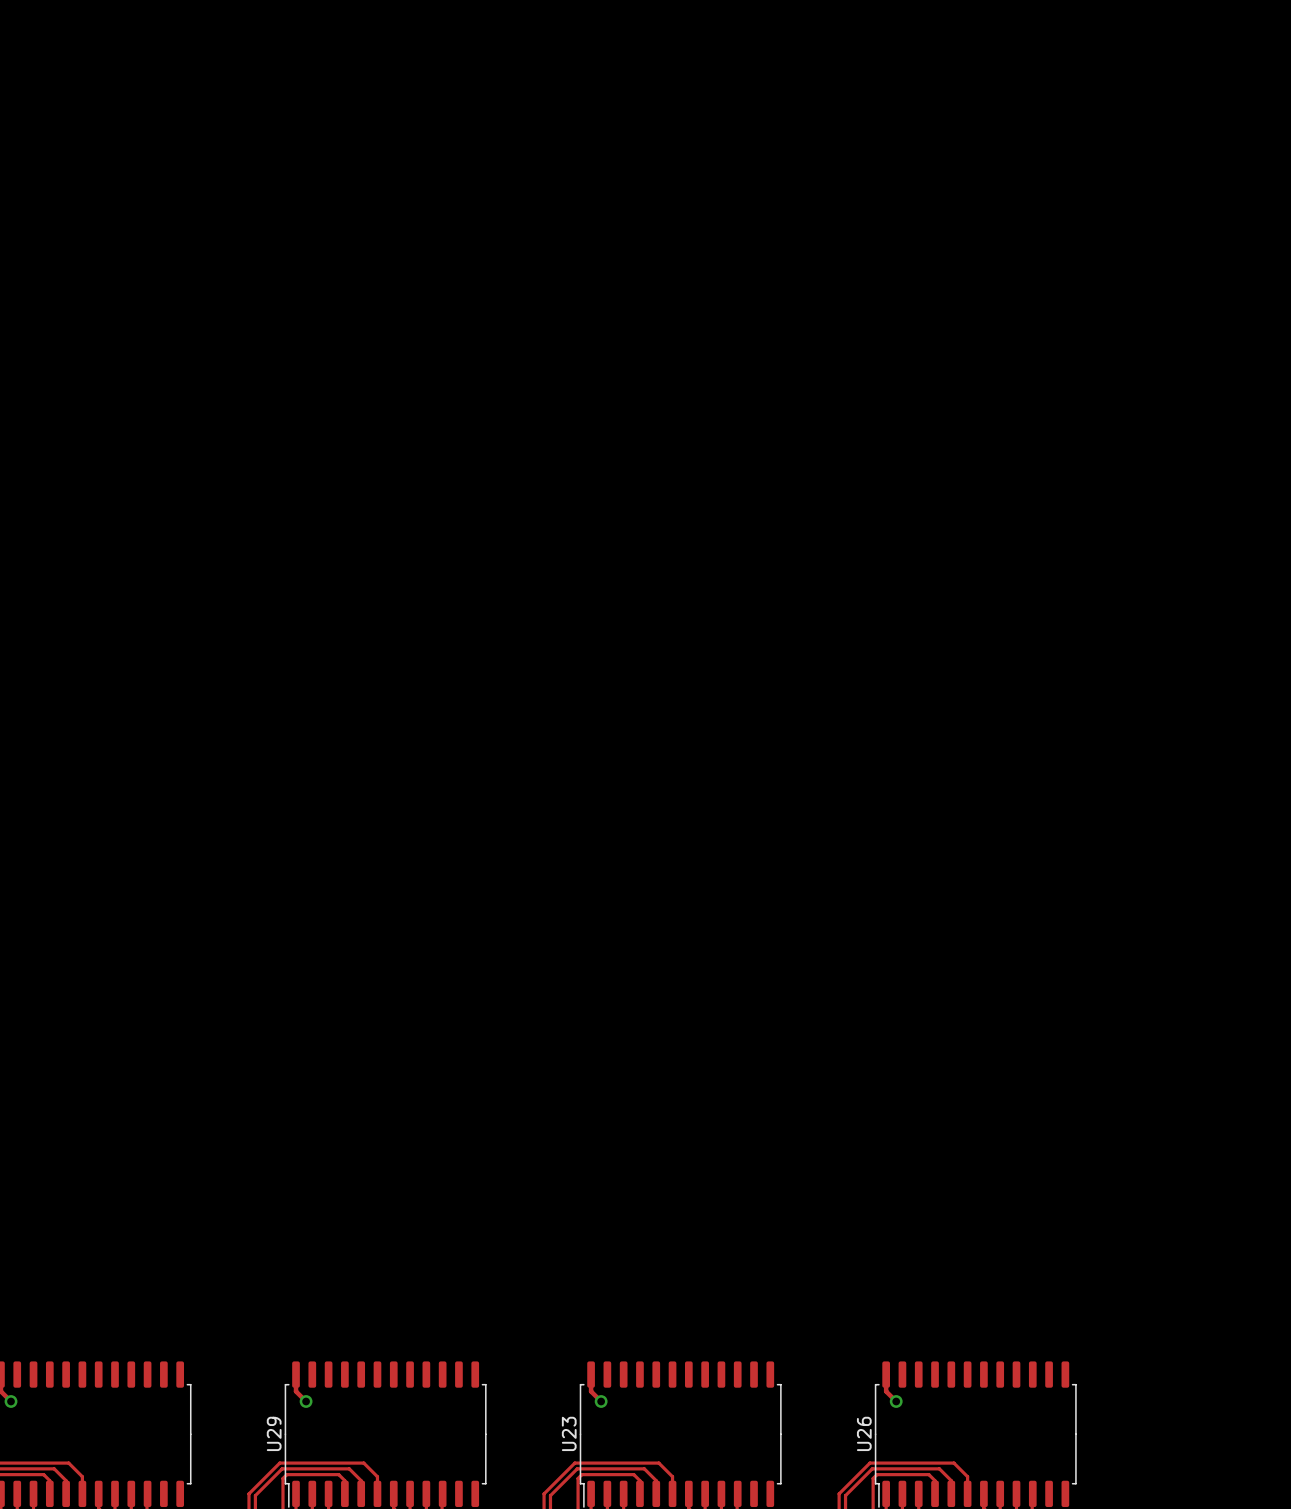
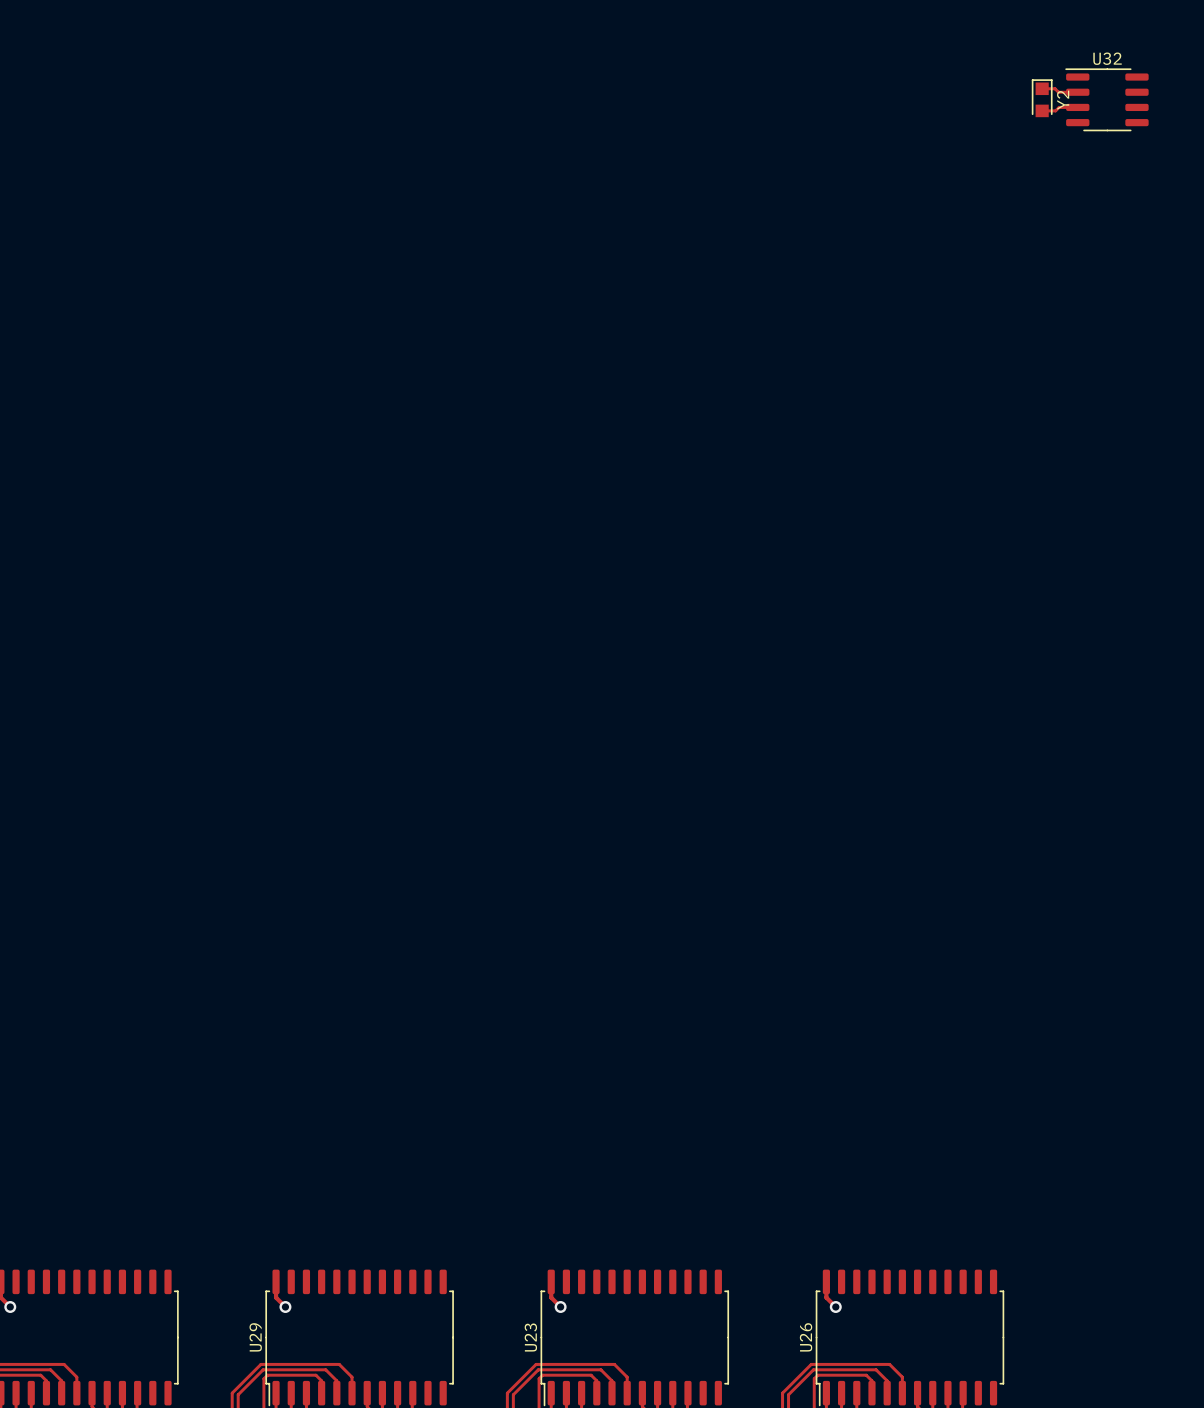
track: none -> (1042, 88) (1055, 88) (1058, 92) (1077, 92)
Y2: none -> (1042, 98)
U32: none -> (1107, 99)
track: none -> (1077, 107) (1059, 107) (1055, 110) (1042, 110)

